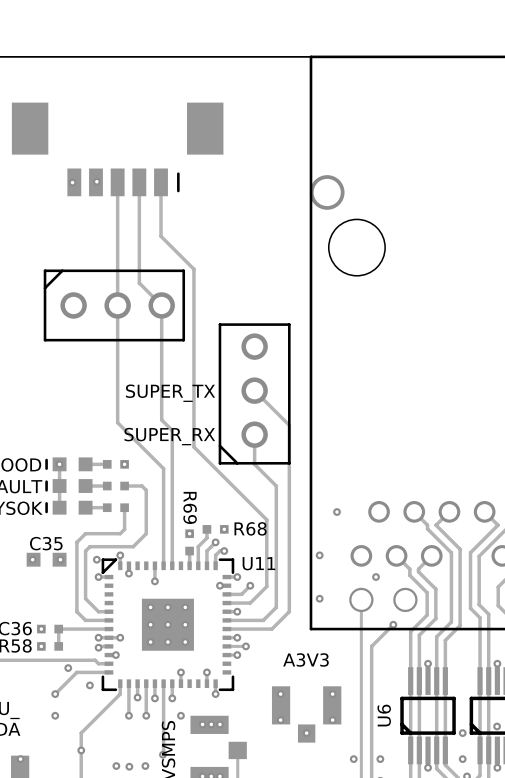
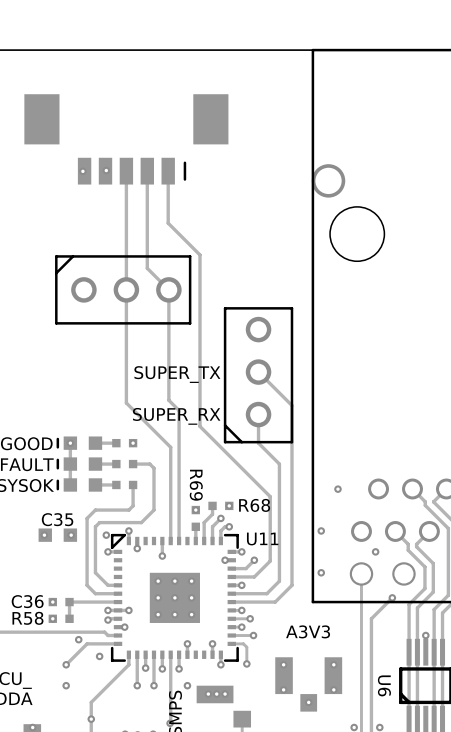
track: none -> (231, 635) (253, 635)
via: none -> (253, 635)
track: none -> (231, 643) (243, 643) (246, 647) (246, 663)
via: none -> (246, 663)
U6 name rotation: 0° (384, 715) -> 180° (384, 685)

